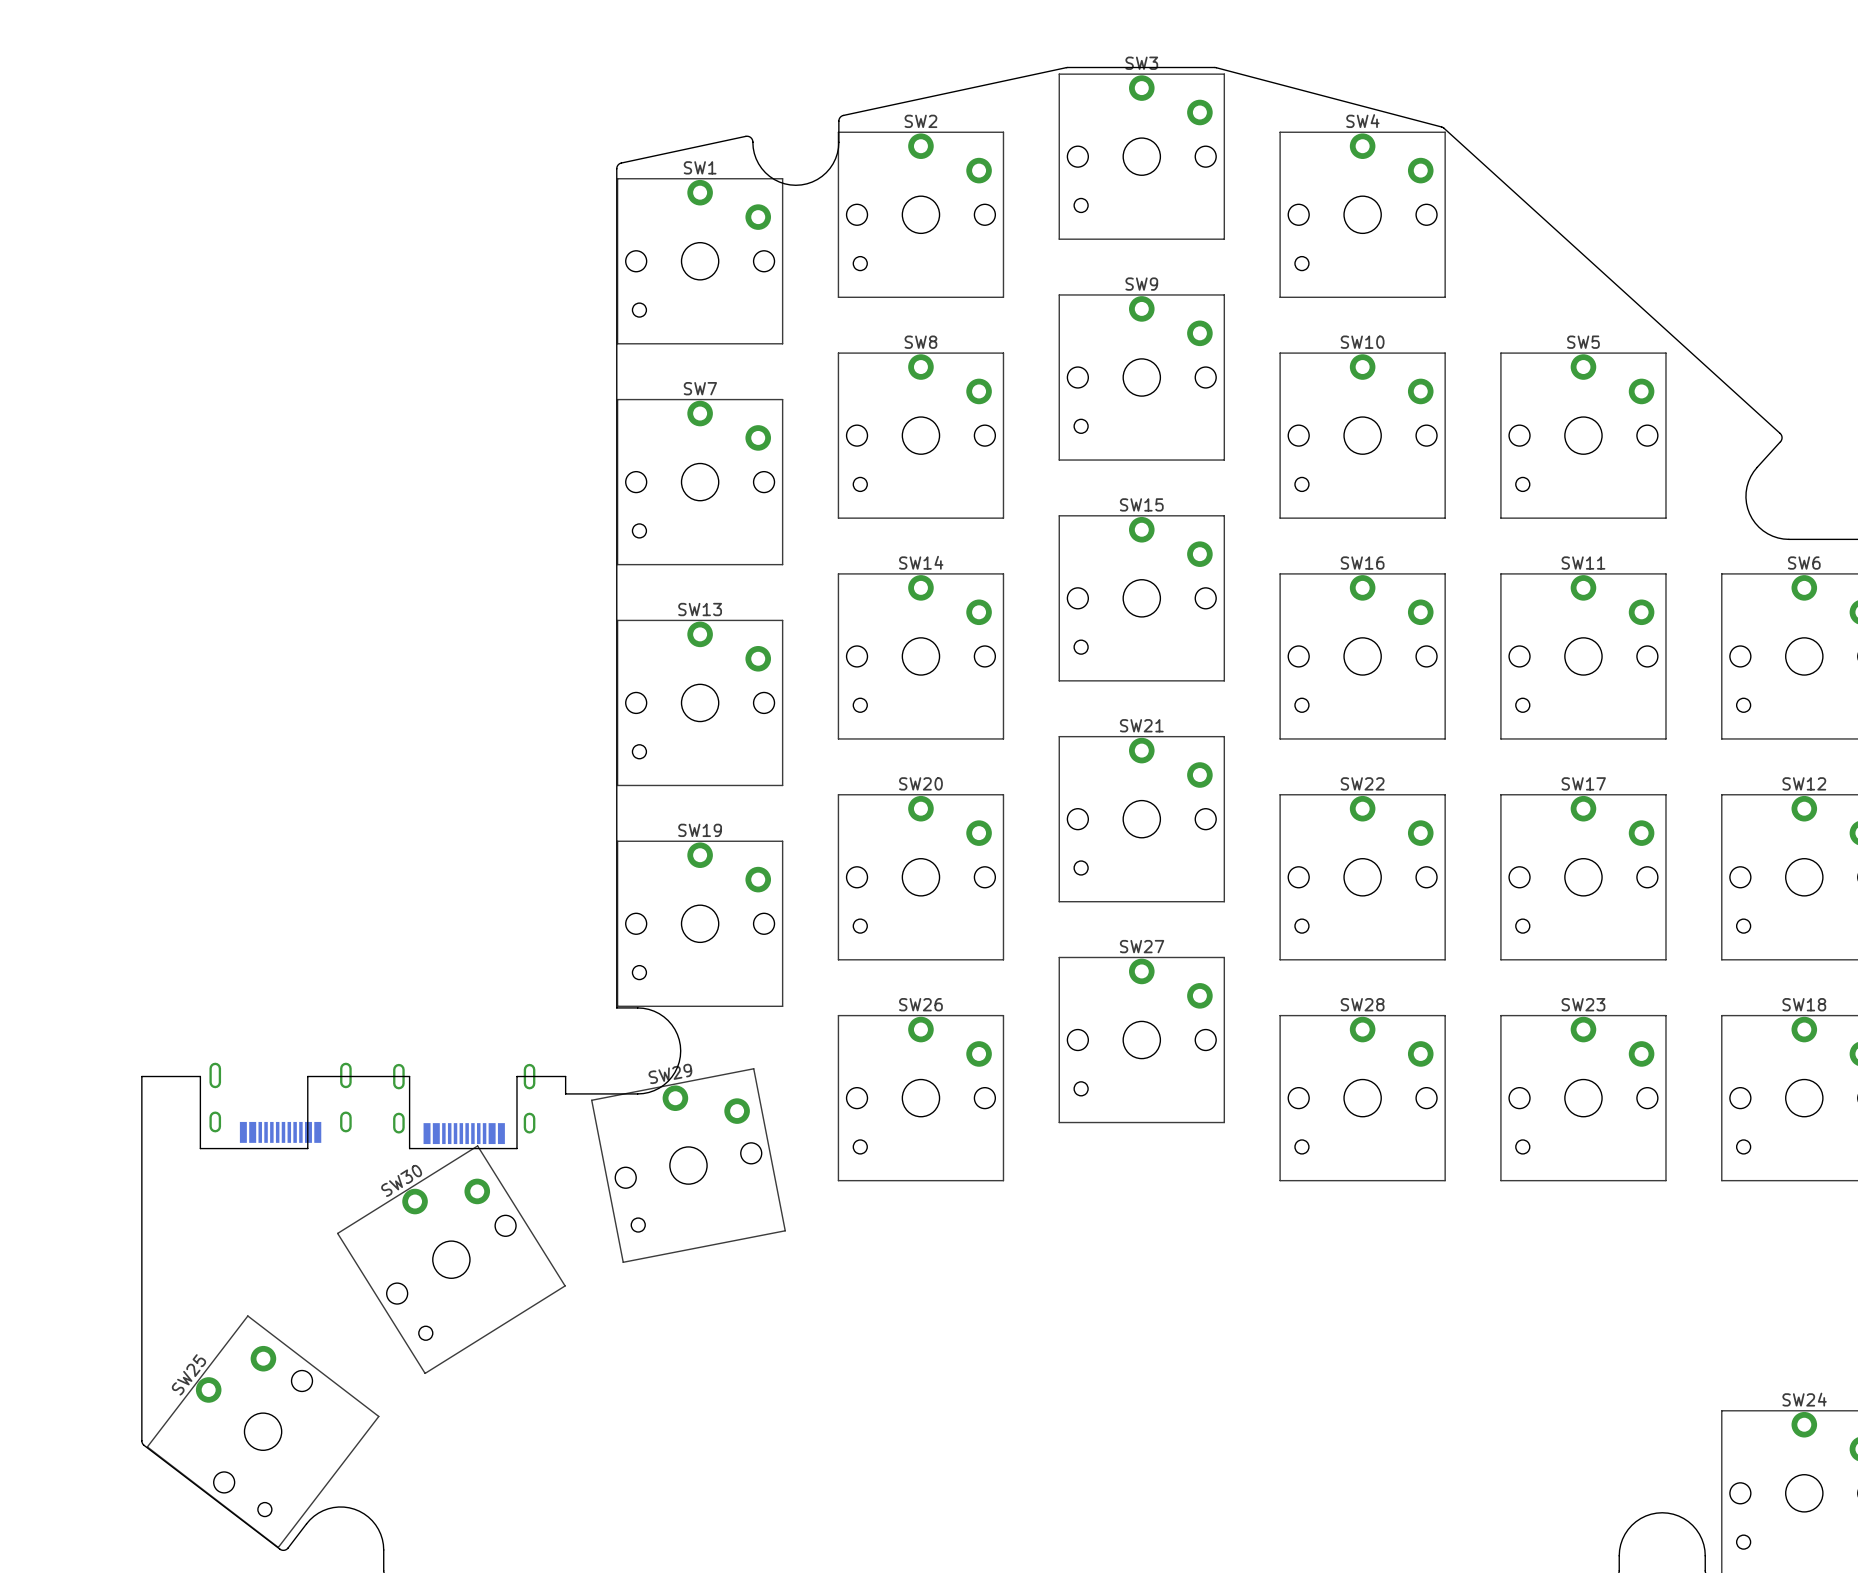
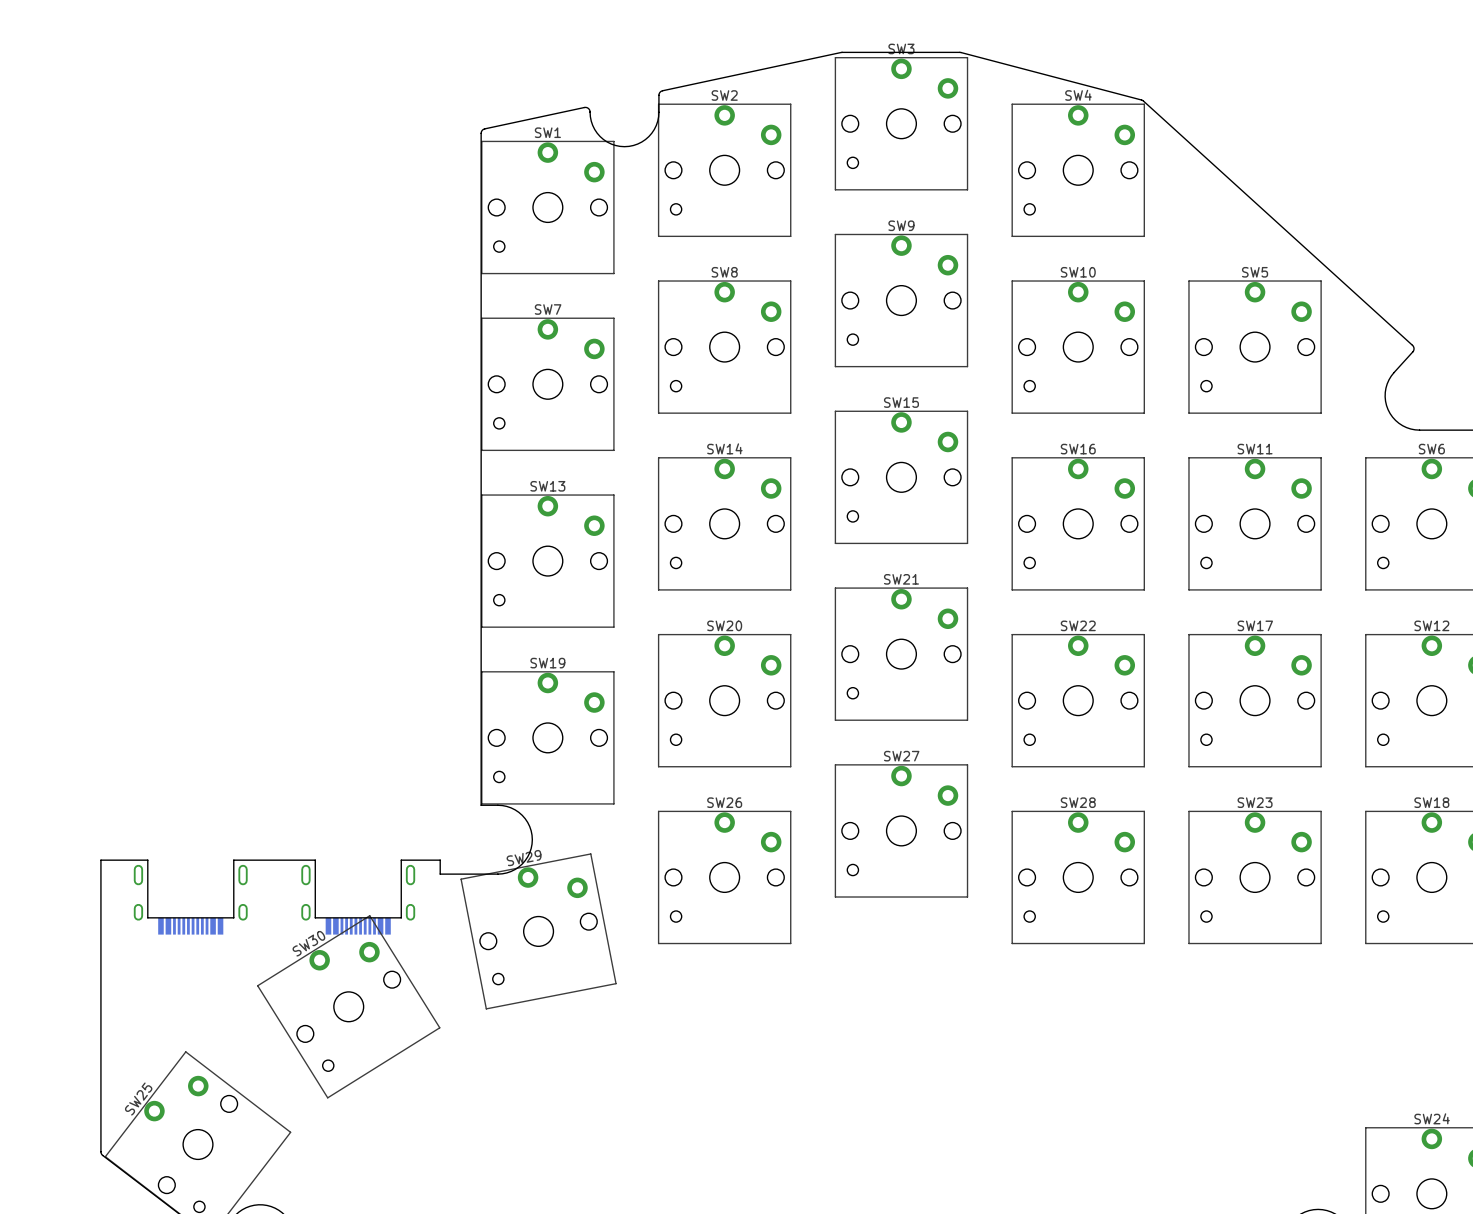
part: (280, 1102) -> none
part: (464, 1103) -> none
part: none -> (190, 899)
part: none -> (358, 899)

